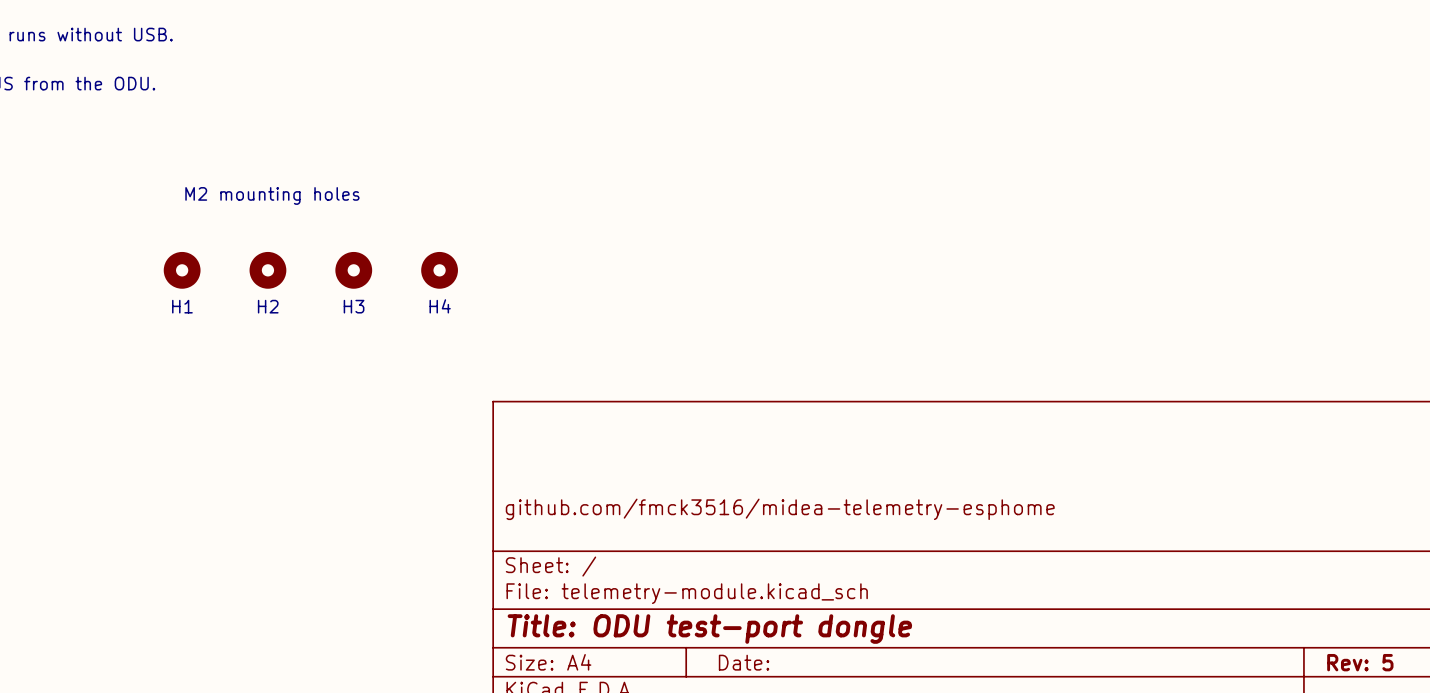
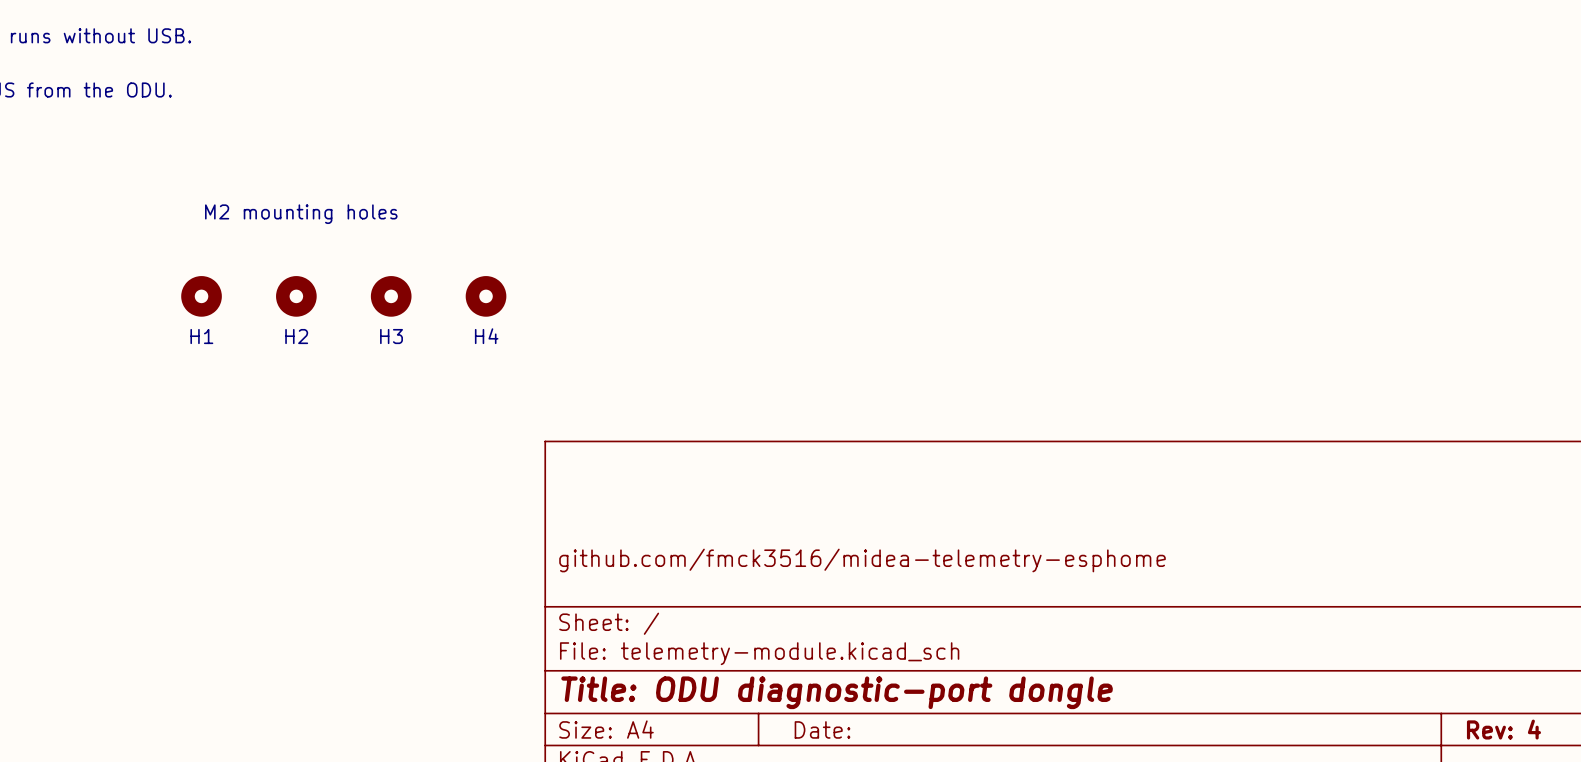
title block: Title: ODU test-port dongle (709, 629) -> Title: ODU diagnostic-port dongle (837, 692)
title block: Rev: 5 (1360, 662) -> Rev: 4 (1503, 729)

